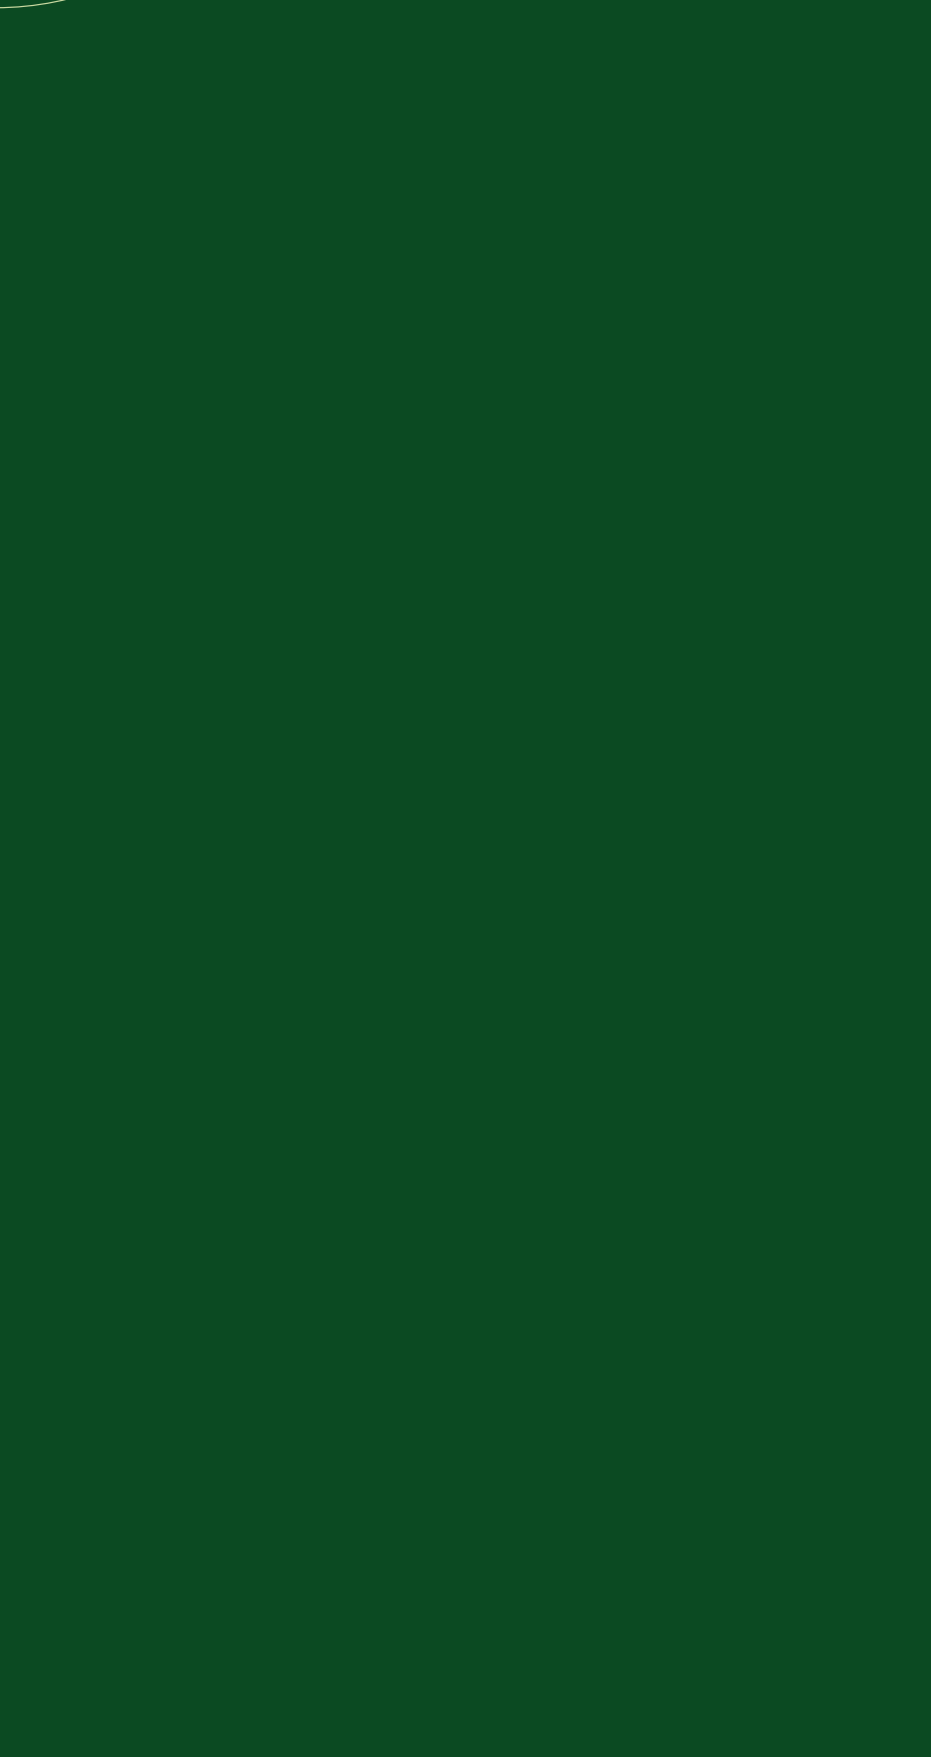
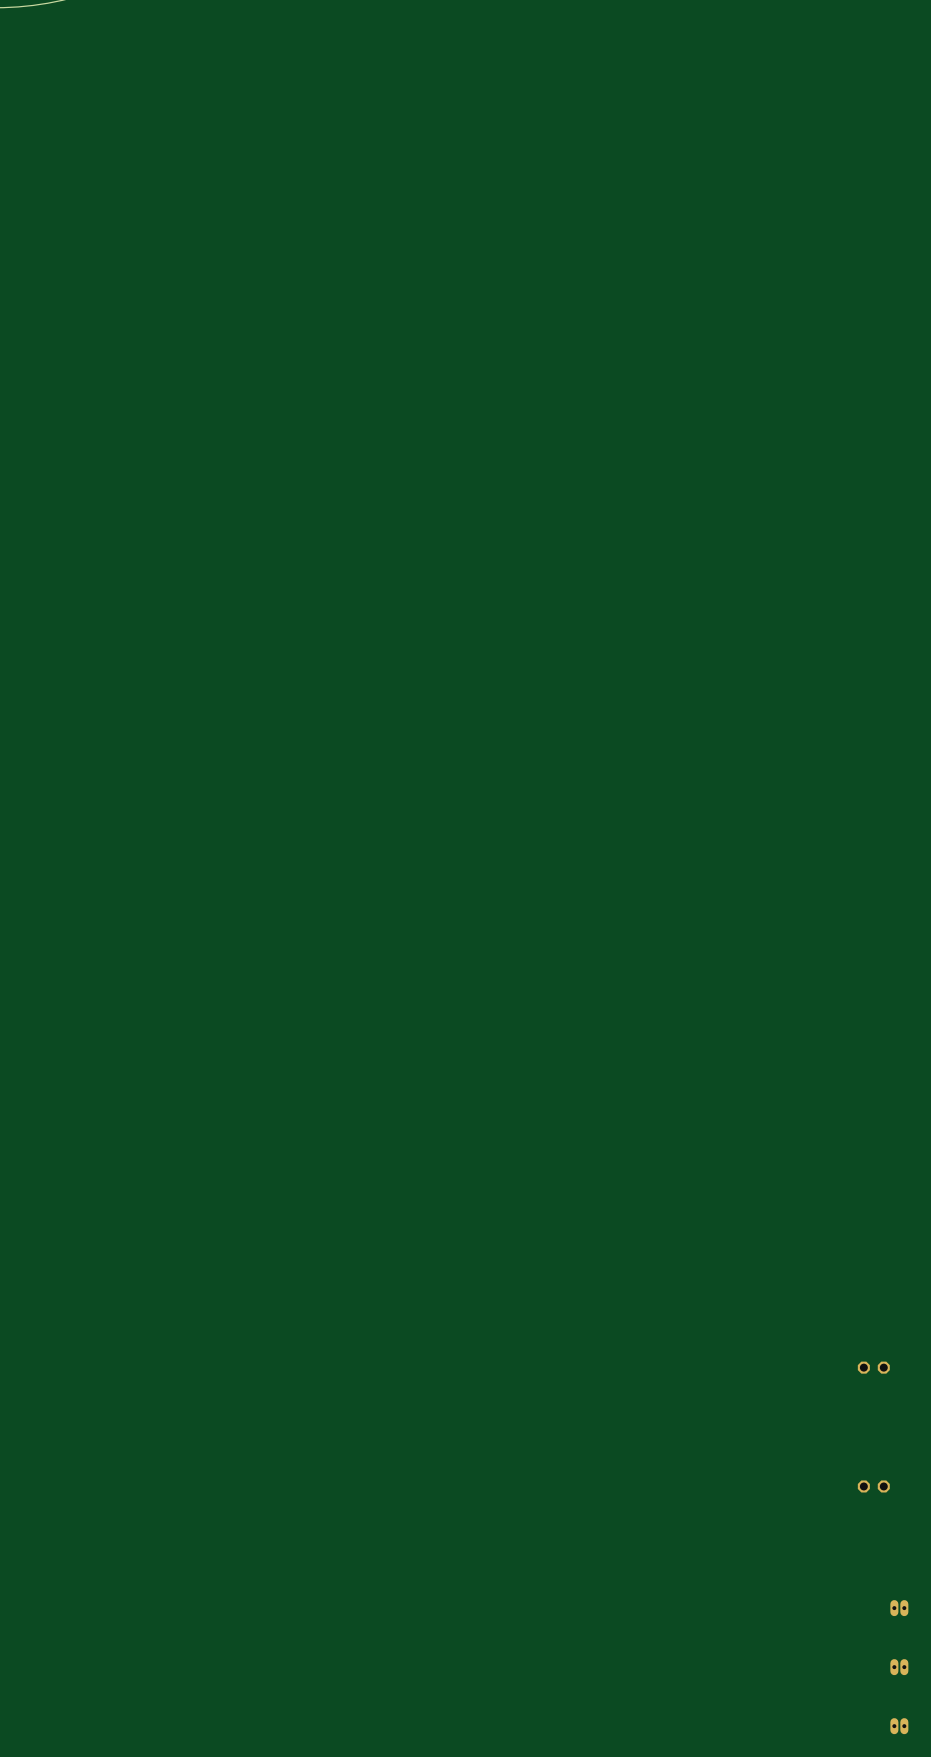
part: none -> (873, 1367)
part: none -> (873, 1486)
part: none -> (899, 1608)
part: none -> (899, 1667)
part: none -> (899, 1726)

